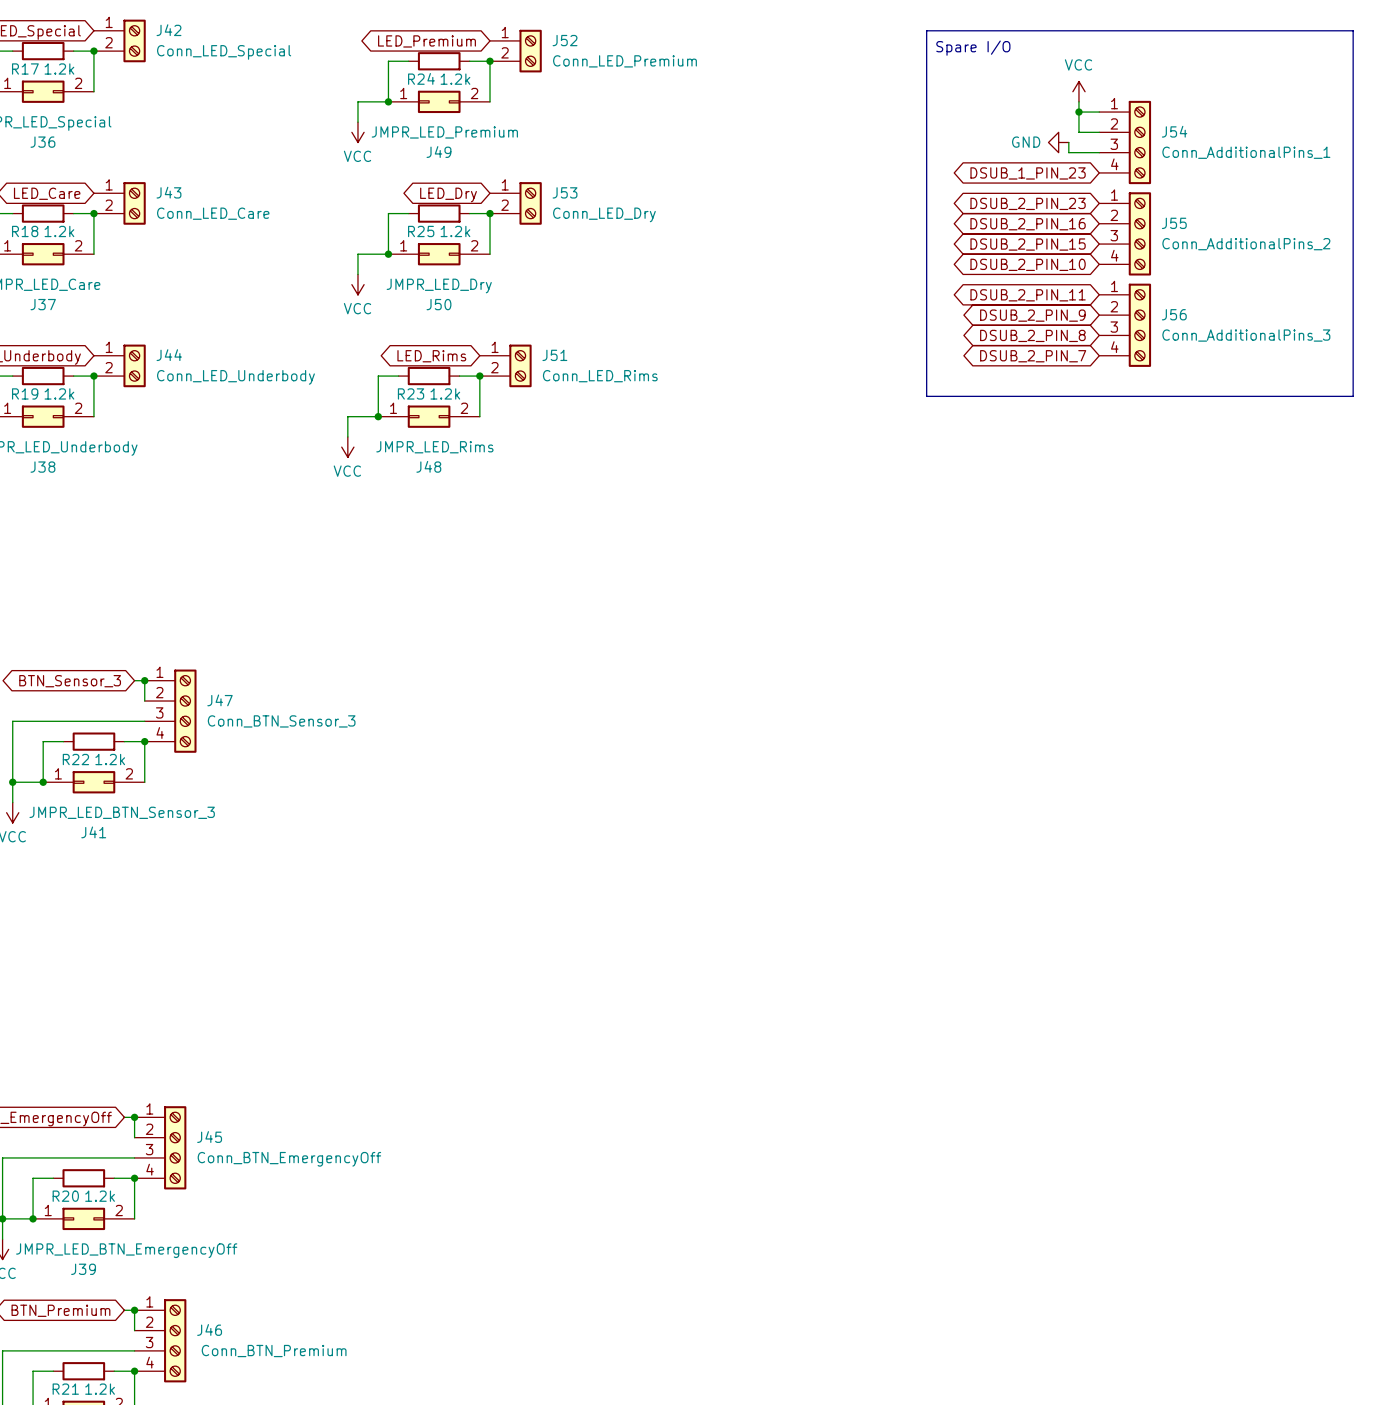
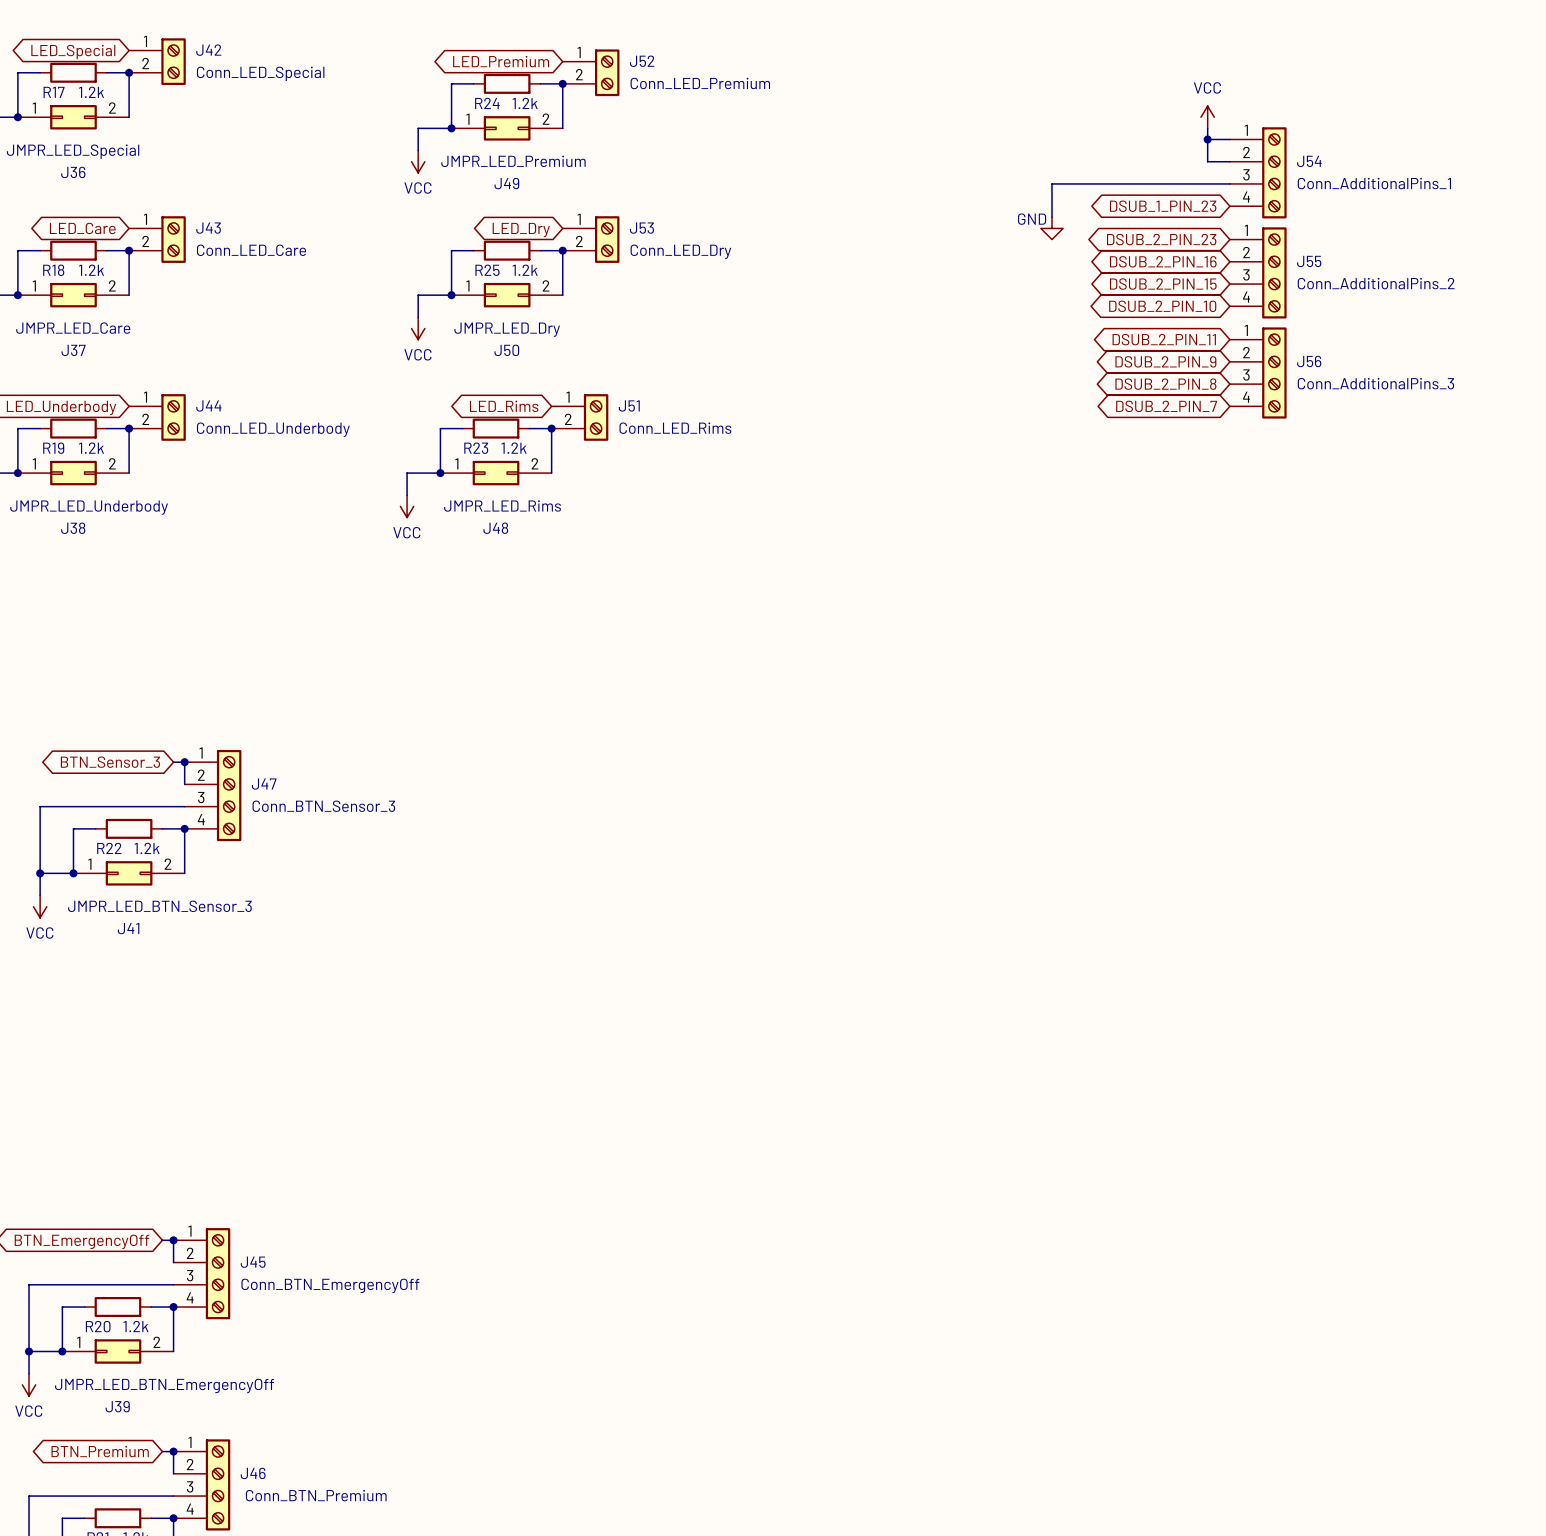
line: (926, 30) (1353, 30) (1353, 396) (926, 396) (926, 30) -> none
text: Spare I/O (973, 48) -> none
power symbol text position: GND (1026, 142) -> GND (1032, 219)
power symbol rotation: 0° (1058, 142) -> 90° counterclockwise (1051, 228)
power symbol position: GND (1058, 142) -> GND (1051, 228)
wire: (1068, 142) (1068, 152) -> (1051, 217) (1051, 183) (1196, 183)

